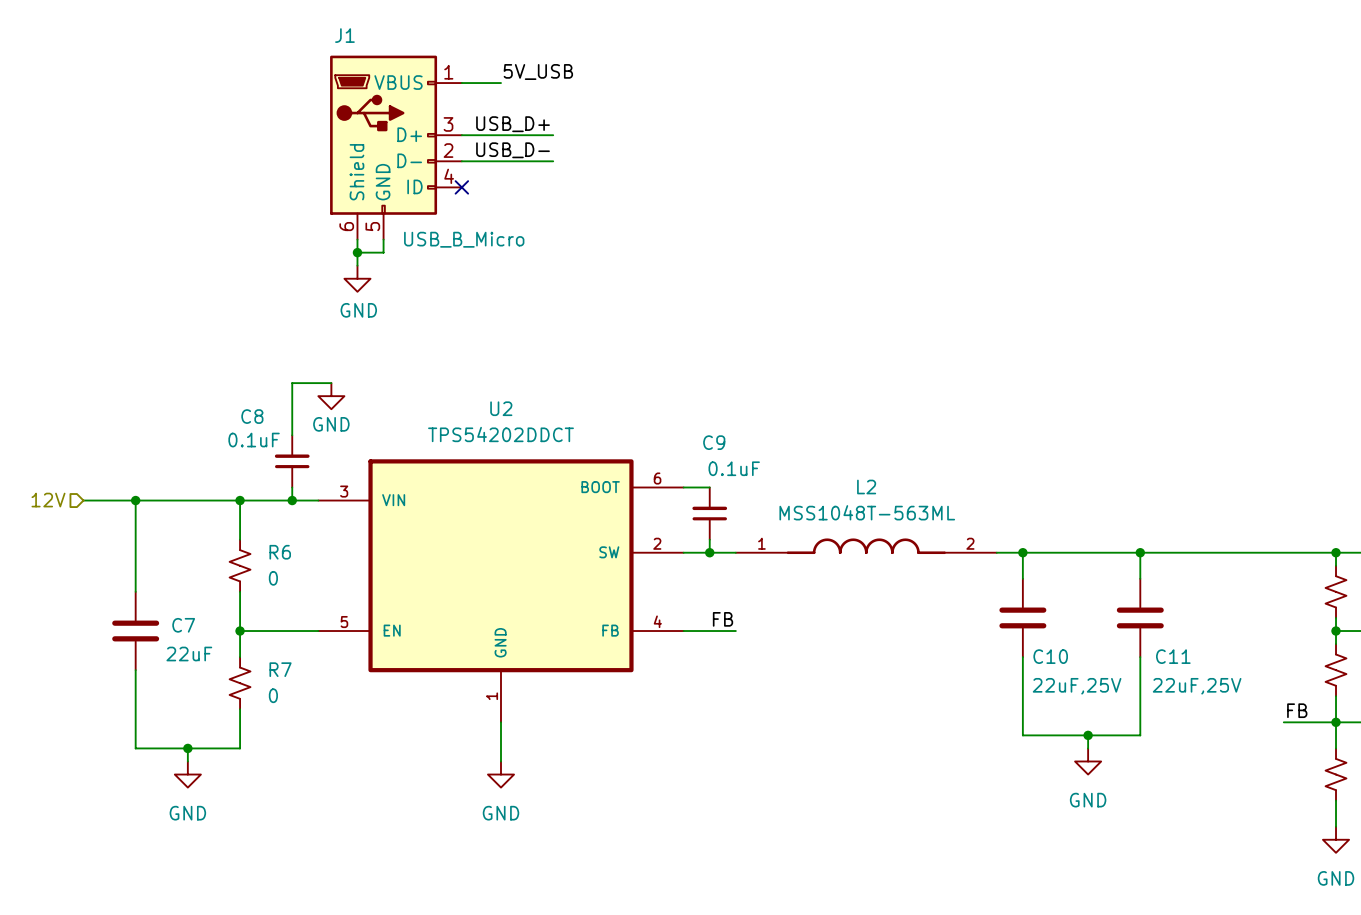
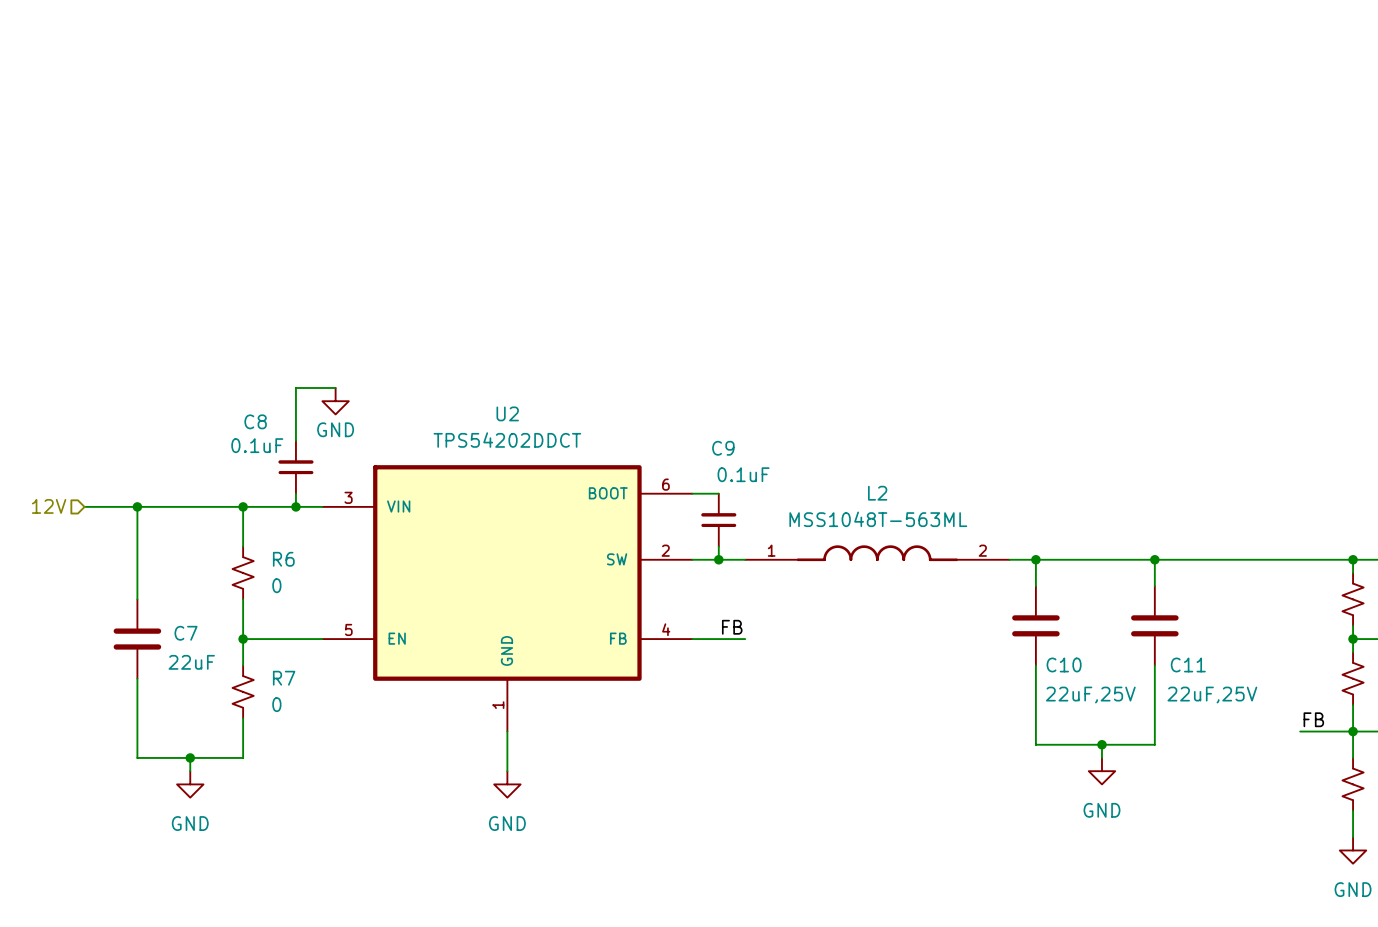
label: 5V_USB (538, 72) -> none
wire: (461, 83) (500, 83) -> none
label: USB_D+ (513, 124) -> none
wire: (461, 135) (553, 135) -> none
J1: USB_B_Micro (395, 147) -> none
label: USB_D- (513, 150) -> none
wire: (461, 161) (553, 161) -> none
no-connect mark: (461, 187) -> none
wire: (357, 239) (357, 265) -> none
wire: (383, 239) (383, 252) (357, 252) -> none
junction: (357, 252) -> none
power symbol: GND (357, 278) -> none

